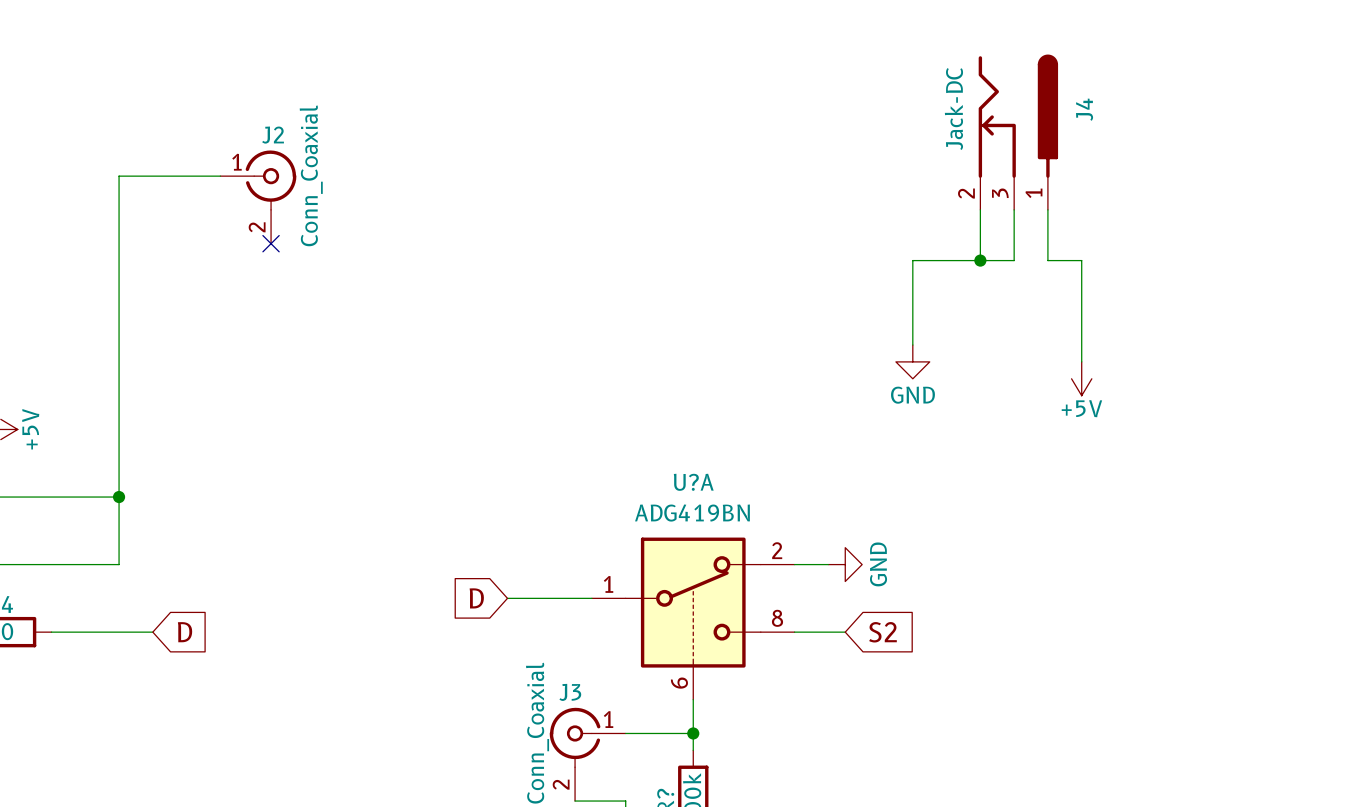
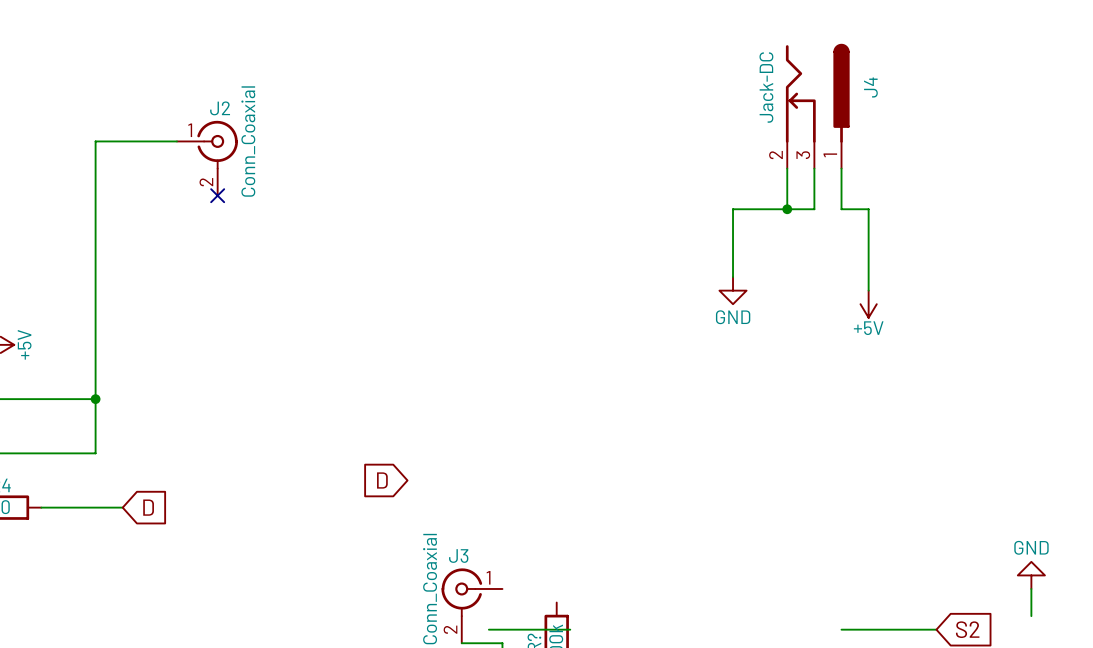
wire: (794, 564) (828, 564) -> none
power symbol: GND (845, 564) -> none
wire: (507, 598) (591, 598) -> none
U?A: ADG419BN (693, 618) -> none
wire: (794, 632) (845, 632) -> none
global label: S2 (882, 632) -> none
wire: (693, 699) (693, 750) -> none
power symbol: none -> GND (1031, 575)
wire: (625, 733) (693, 733) -> none
junction: (693, 733) -> none
wire: none -> (1031, 588) (1031, 616)
wire: none -> (488, 629) (570, 629)
wire: none -> (841, 629) (936, 629)
global label: none -> S2 (967, 629)

